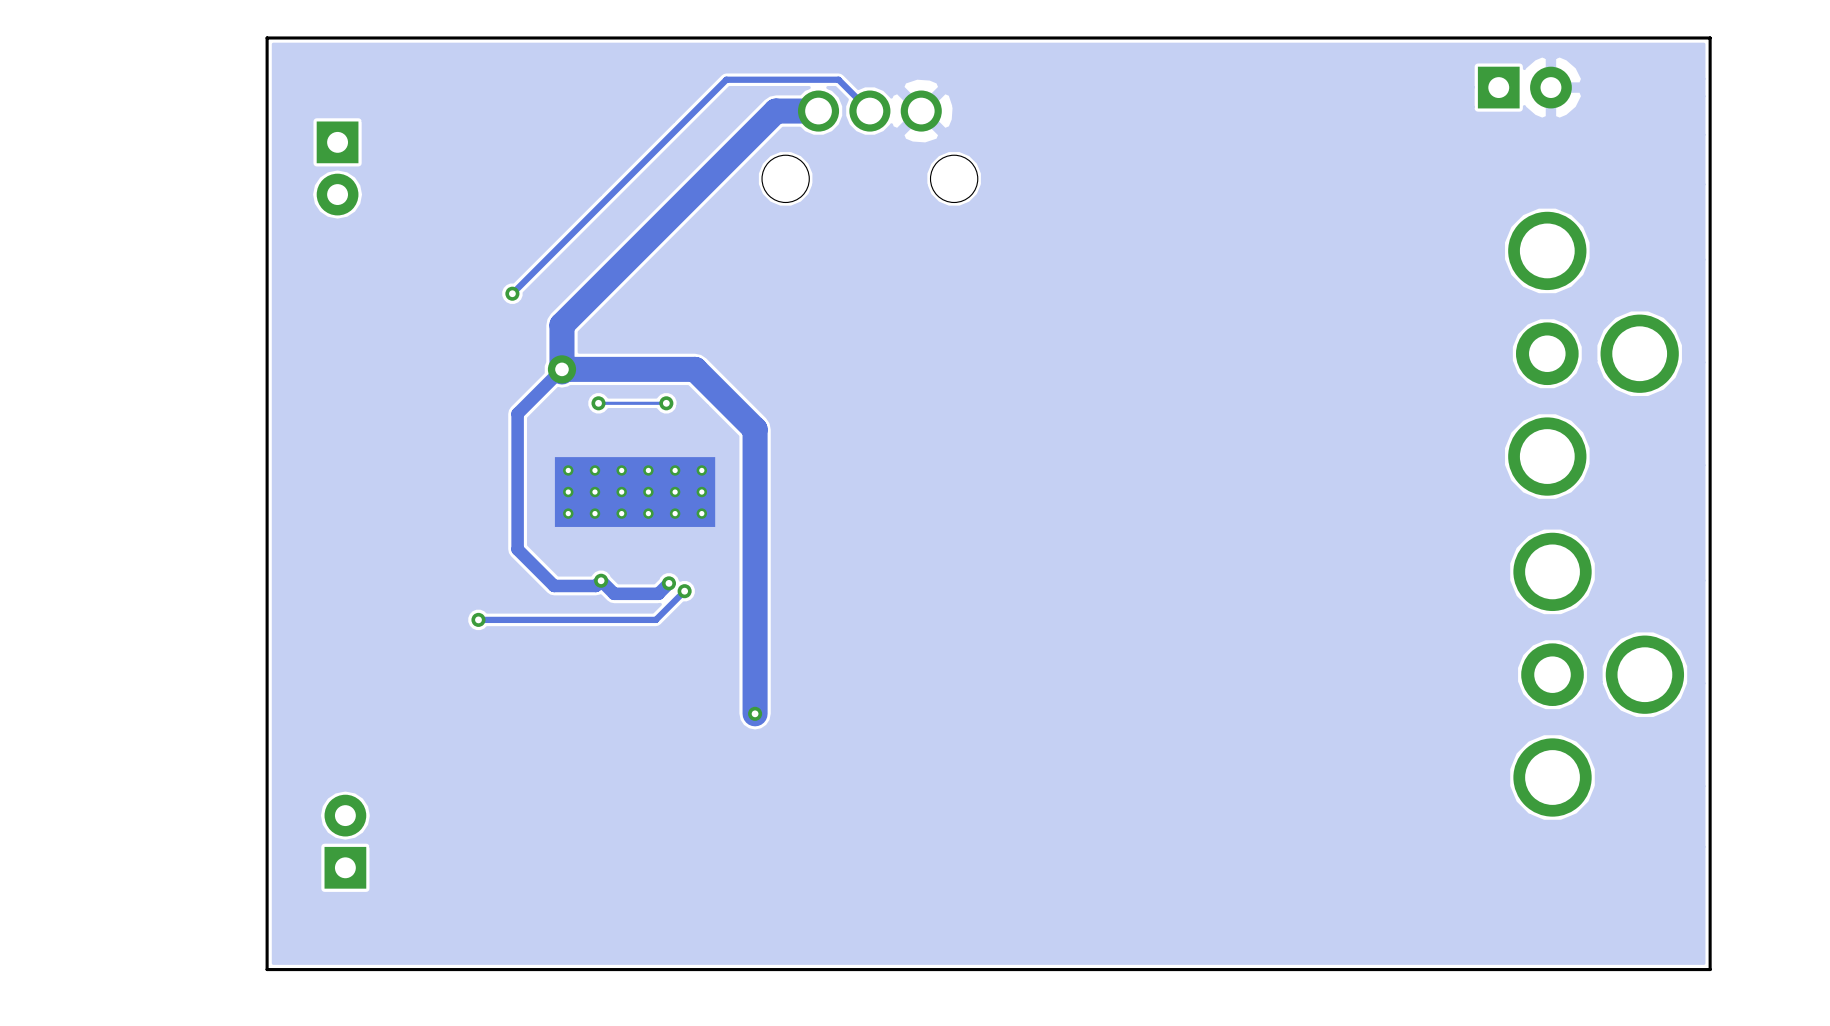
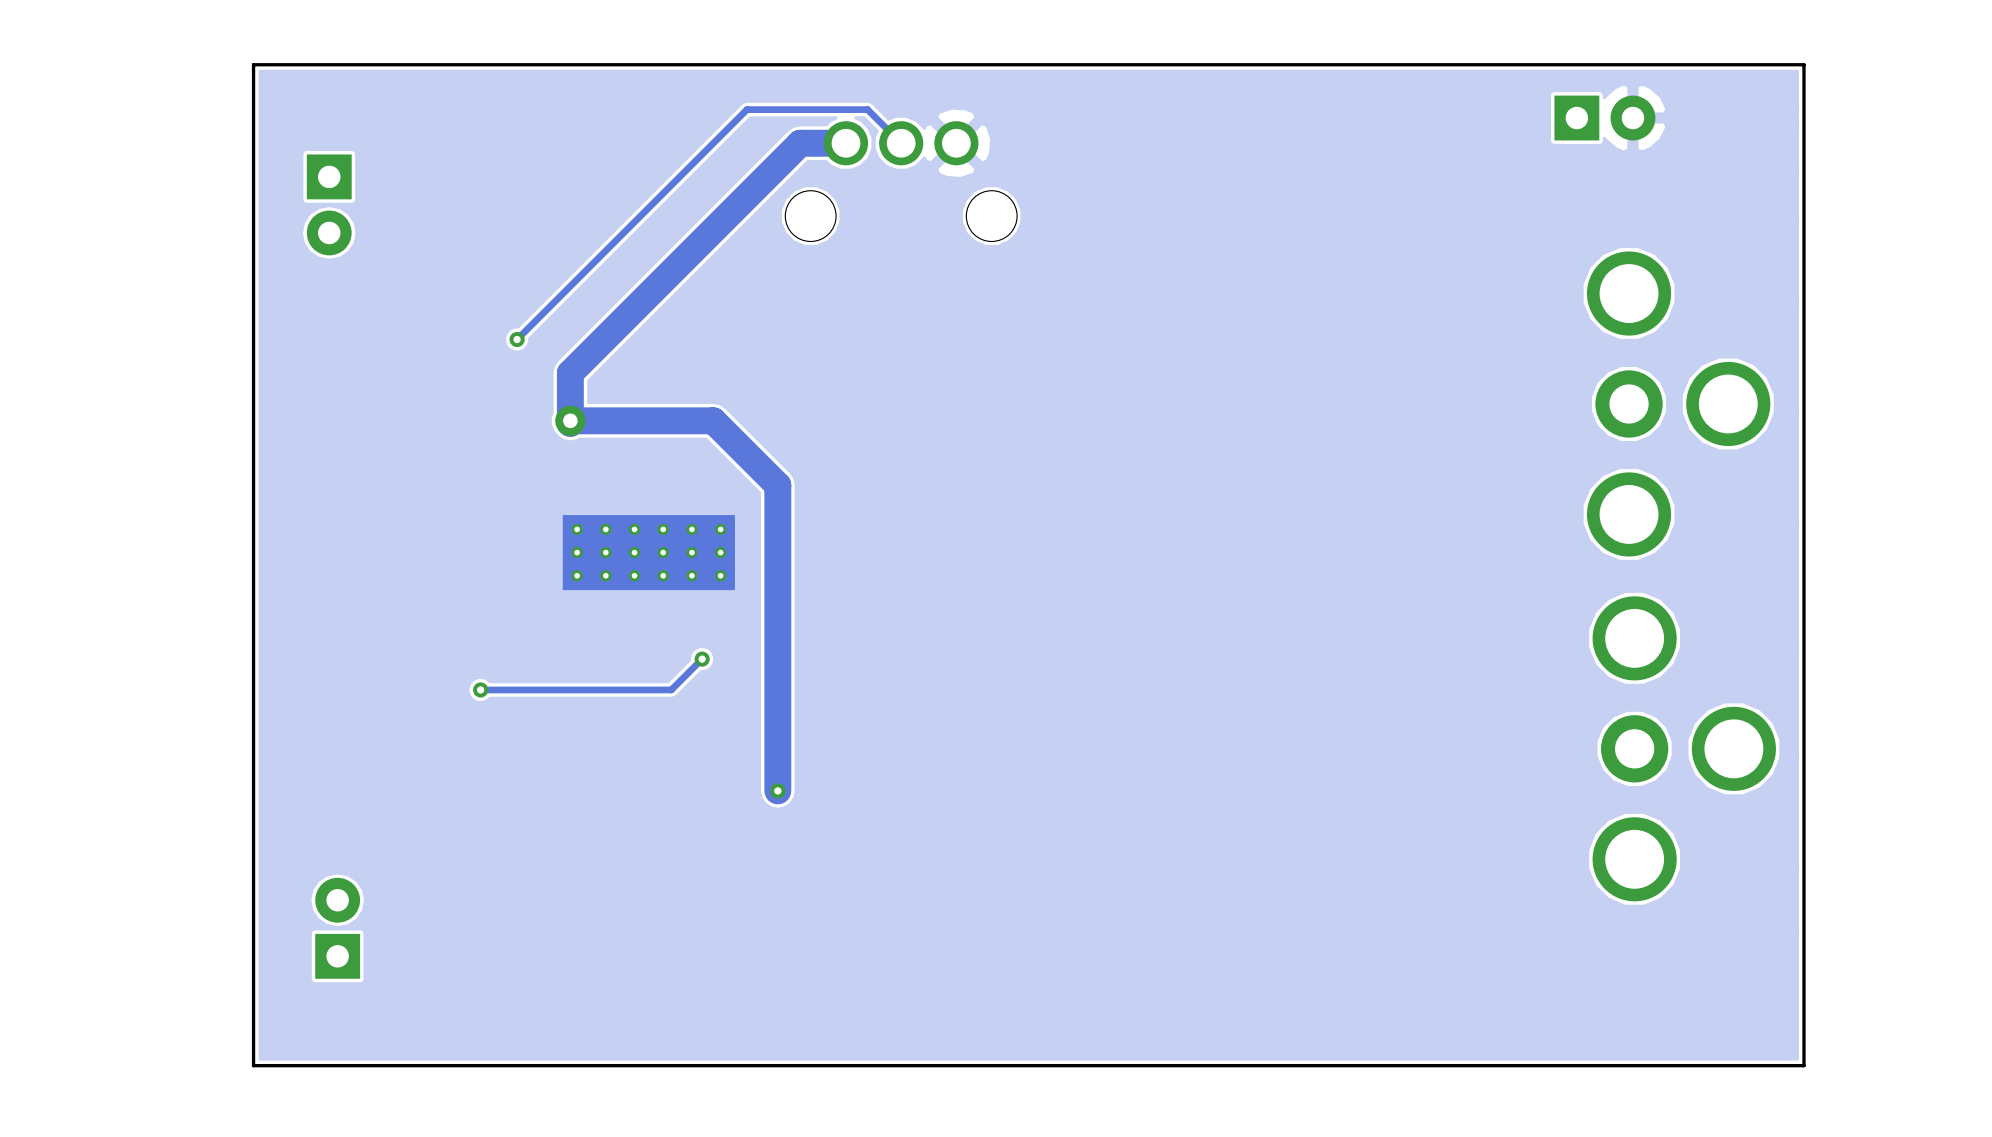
track: (561, 369) (517, 413) (517, 549) (554, 585) (595, 585) (601, 580) (614, 593) (658, 593) (668, 583) -> none
via: (598, 403) -> none
track: (666, 403) (598, 403) -> none
via: (666, 403) -> none
via: (601, 580) -> none
via: (668, 583) -> none

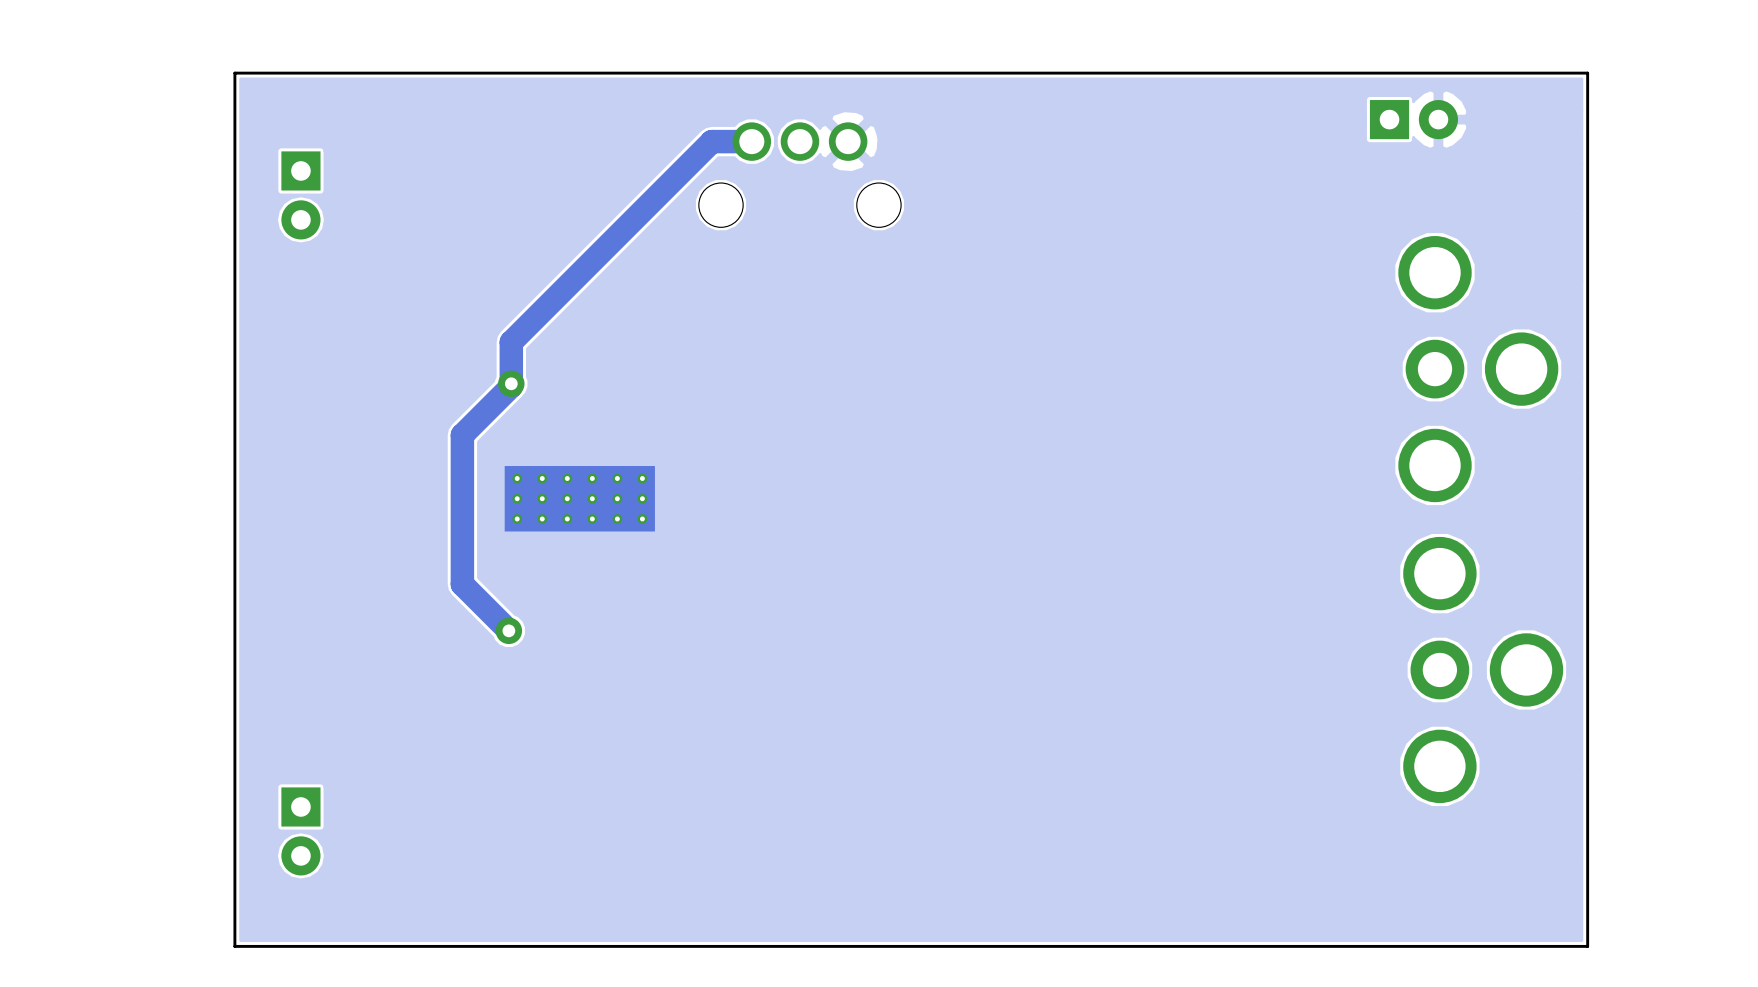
track: (901, 143) (867, 109) (747, 109) (517, 339) -> none
via: (517, 339) -> none
track: (570, 418) (570, 420) (713, 420) (777, 485) (777, 790) -> none
track: none -> (511, 386) (462, 435) (462, 584) (508, 630)
track: (702, 659) (671, 689) (480, 689) -> none
via: (702, 659) -> none
via: (480, 689) -> none
via: none -> (508, 630)
via: (777, 790) -> none
part rotation: 0° (337, 928) -> 180° (300, 831)

